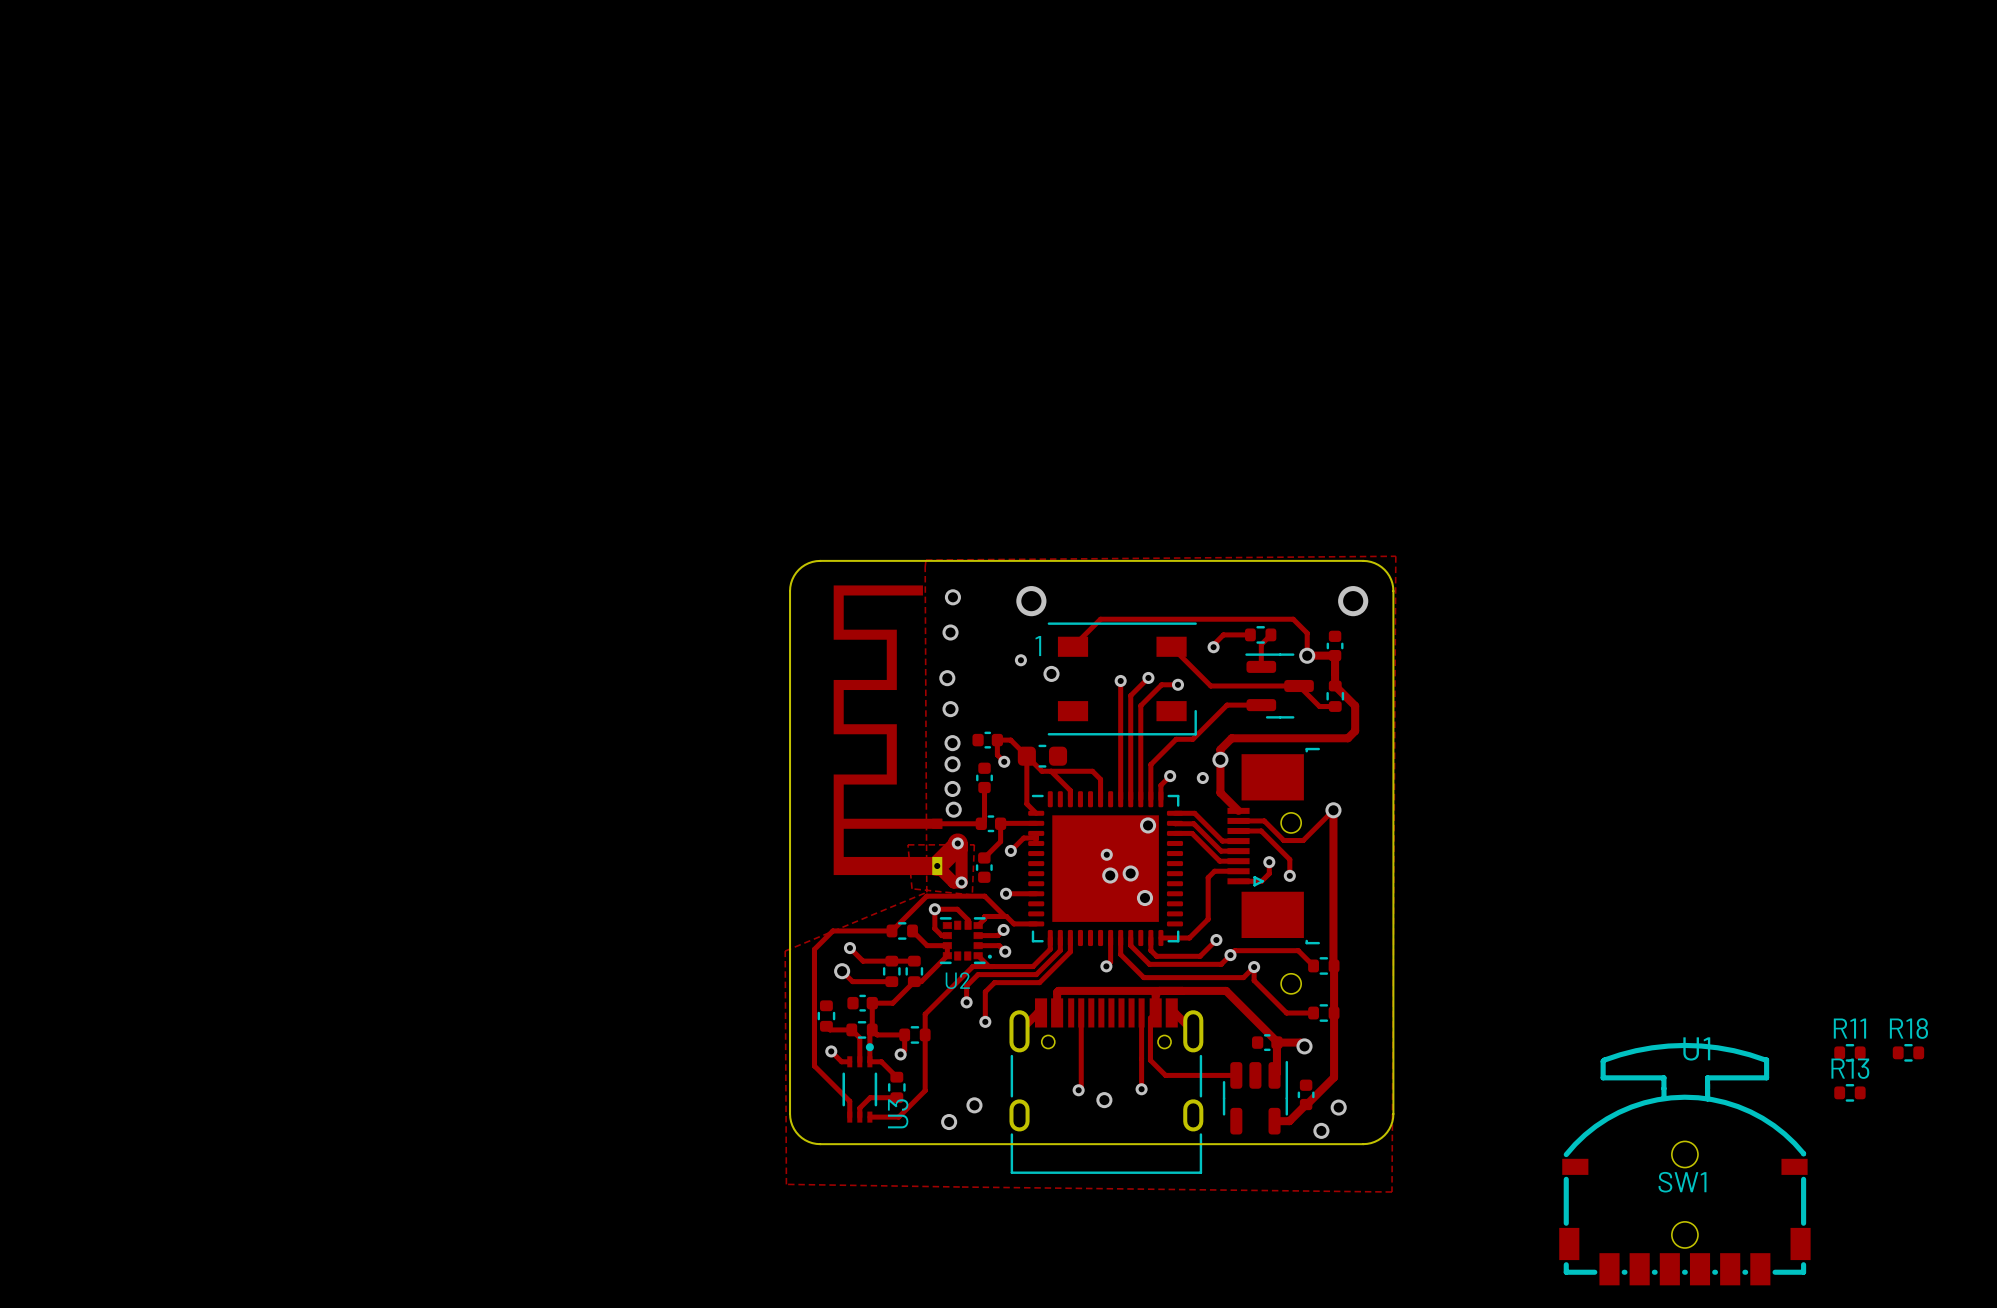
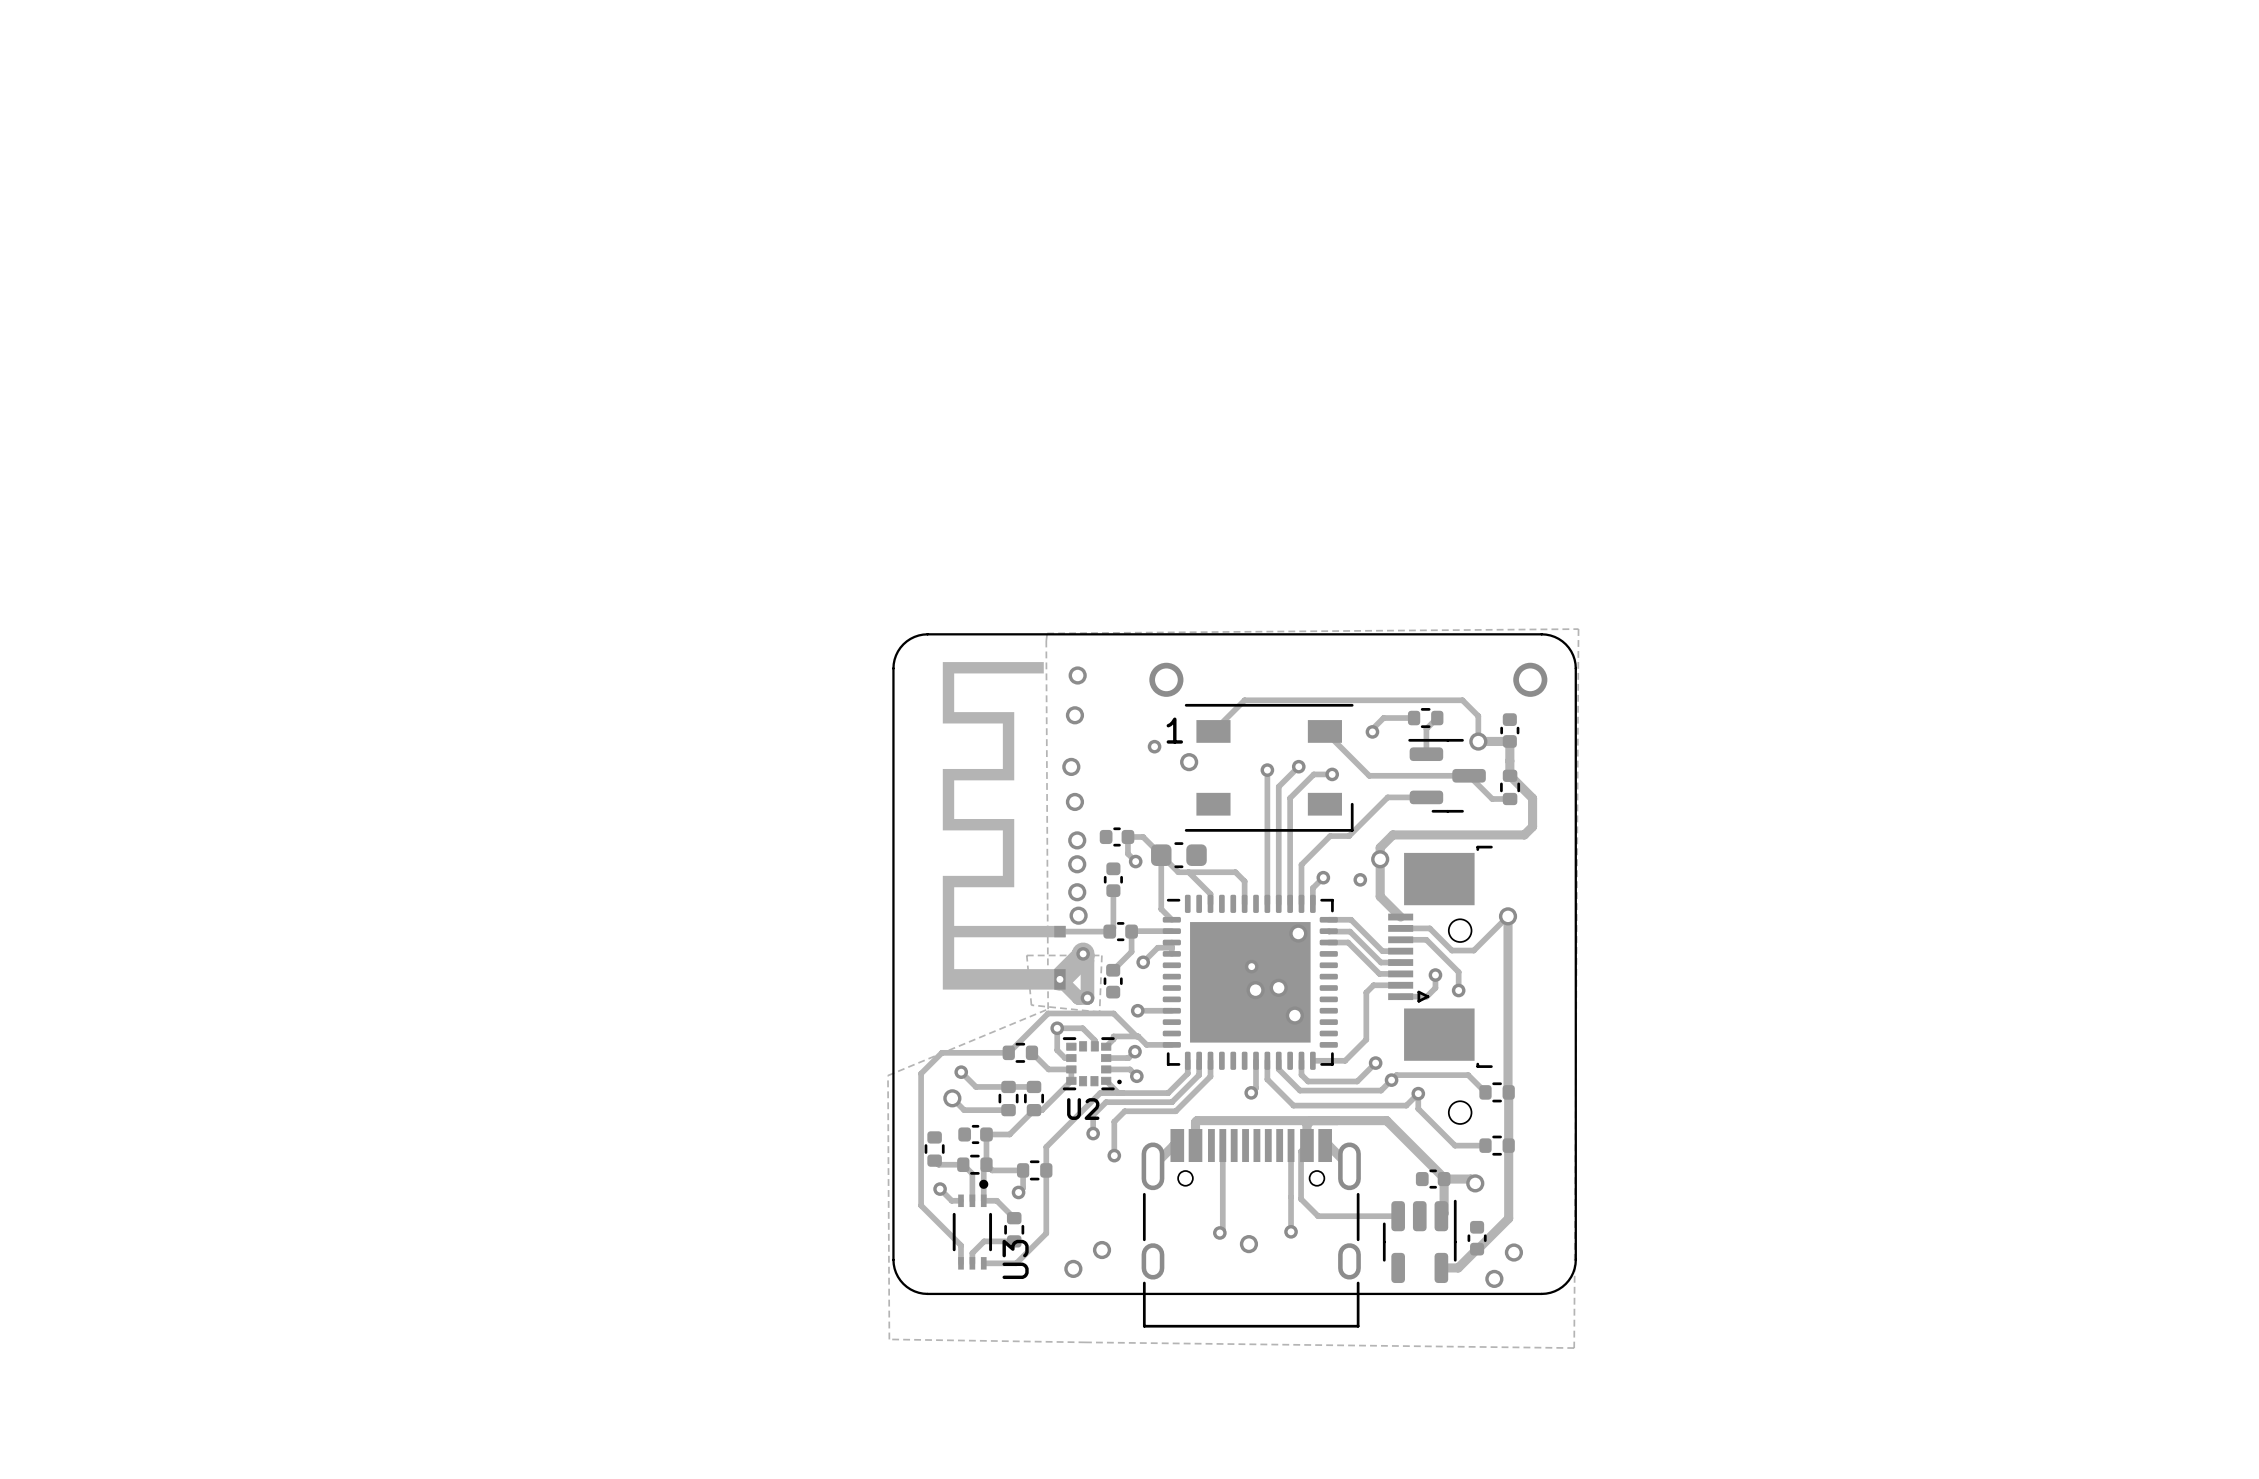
R11: (1849, 1052) -> none
R18: (1908, 1052) -> none
R13: (1849, 1092) -> none
SW1: (1684, 1164) -> none

